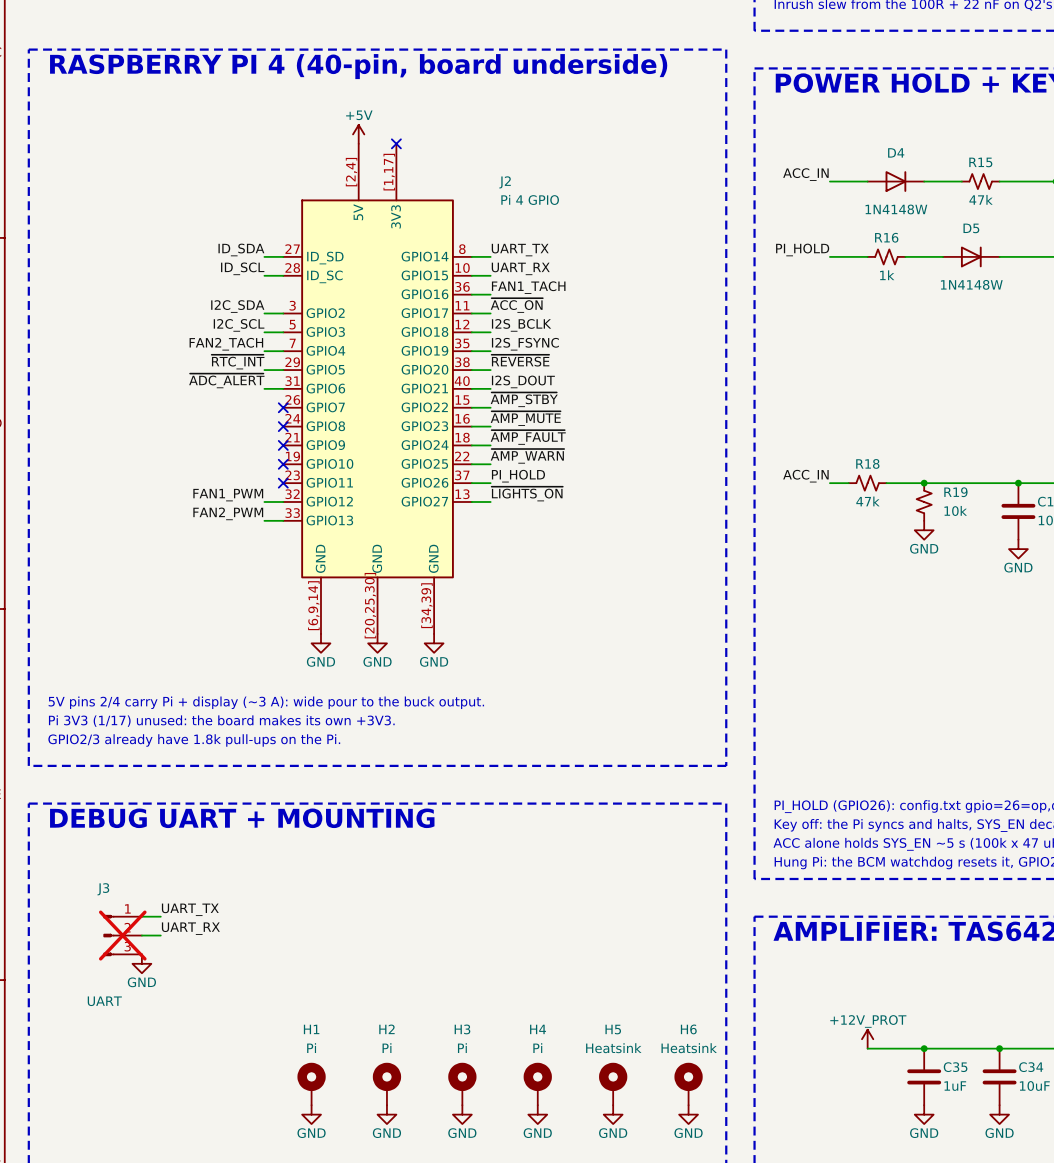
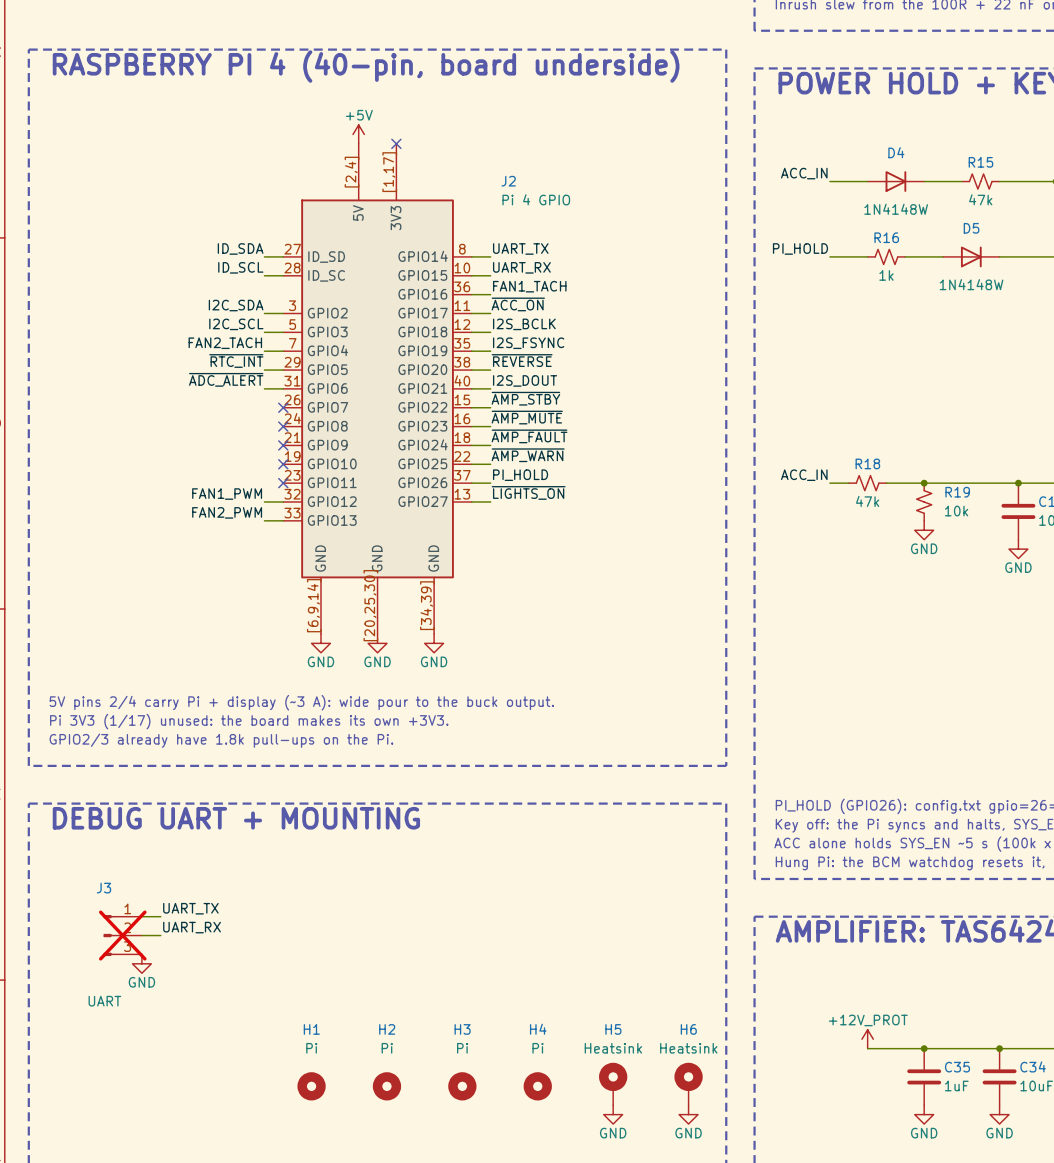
H1 symbol: [297, 1062, 326, 1106] -> [297, 1072, 326, 1101]
H2 symbol: [372, 1062, 402, 1106] -> [372, 1072, 402, 1101]
H3 symbol: [448, 1062, 477, 1106] -> [448, 1072, 477, 1101]
H4 symbol: [523, 1062, 552, 1106] -> [523, 1072, 552, 1101]
power symbol: GND (311, 1114) -> none
power symbol: GND (386, 1114) -> none
power symbol: GND (462, 1114) -> none
power symbol: GND (537, 1114) -> none

